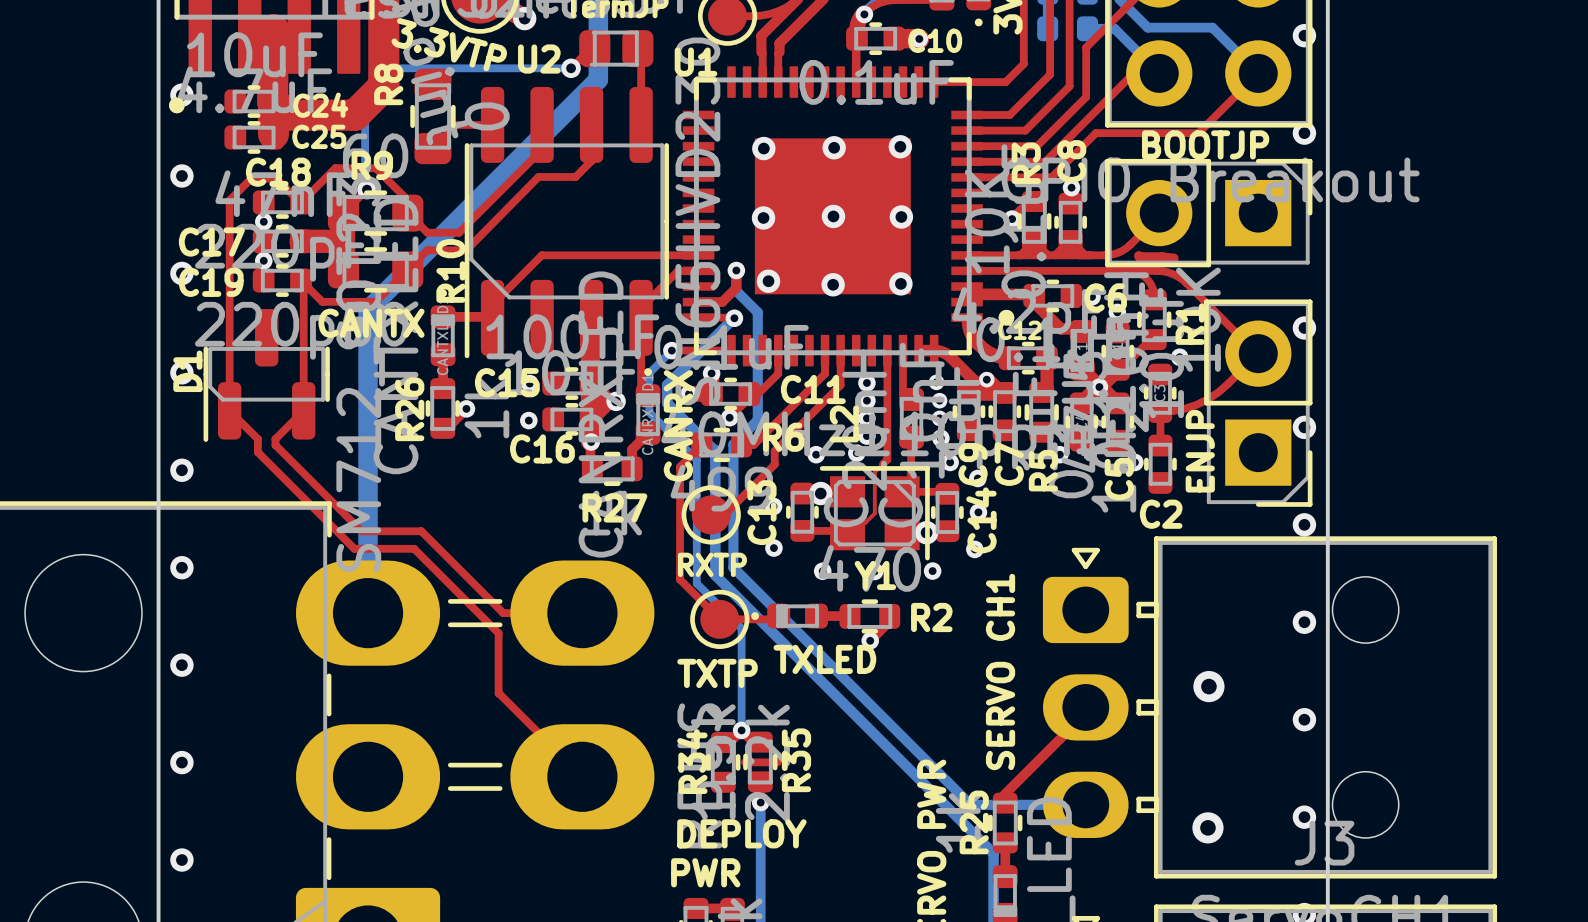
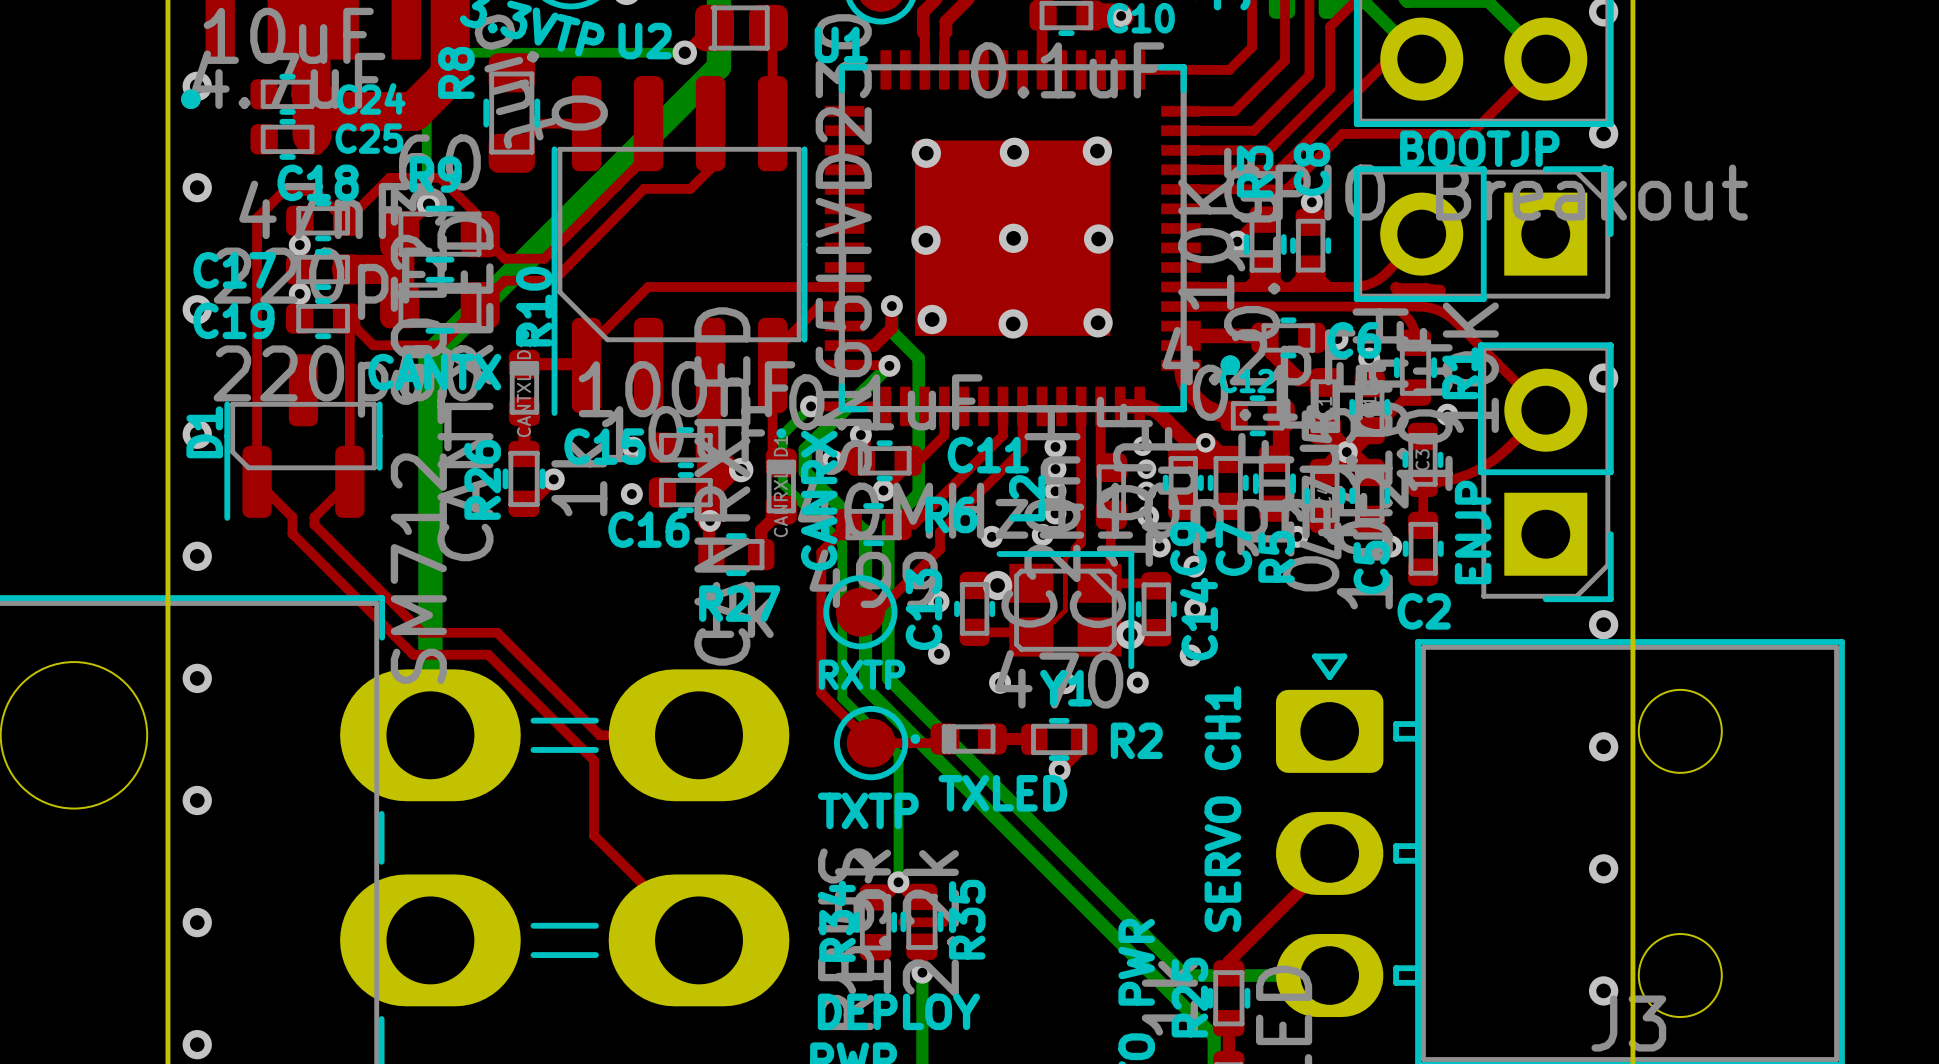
via: (1304, 427) -> none
via: (1208, 686) -> none
via: (1207, 827) -> none

